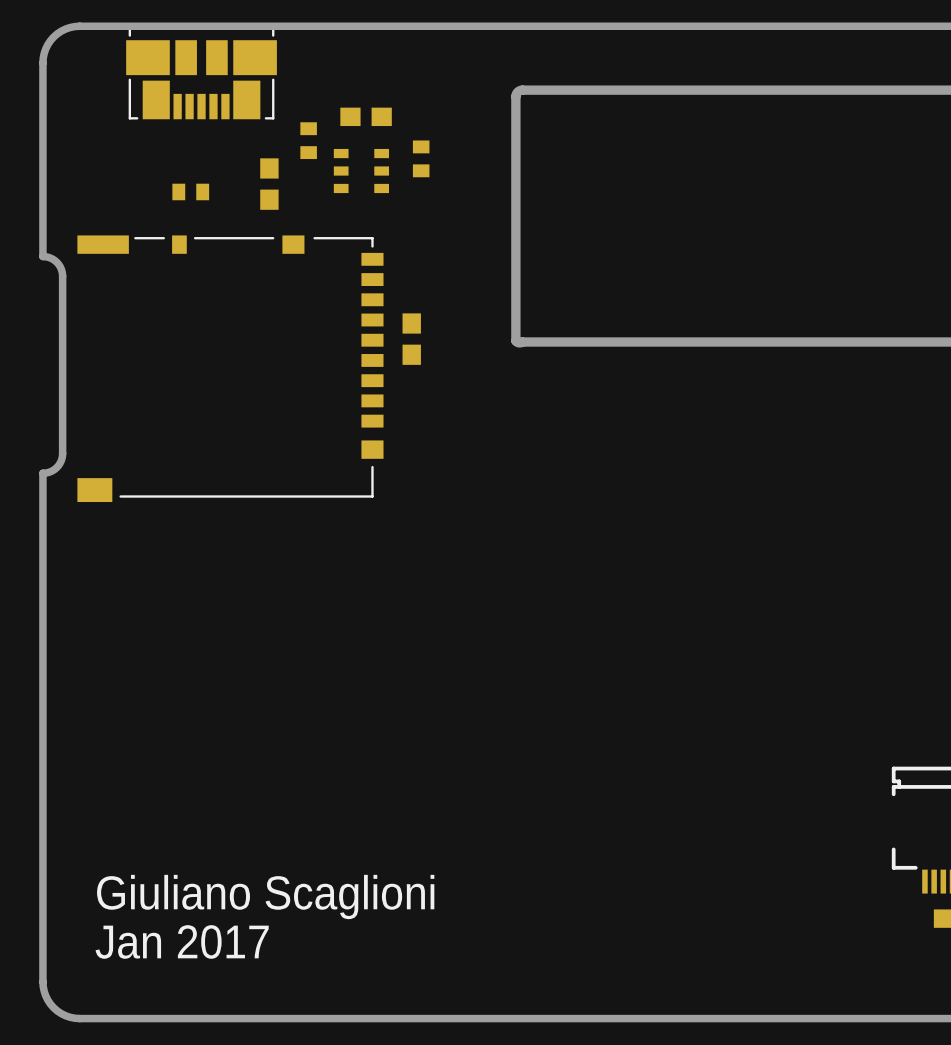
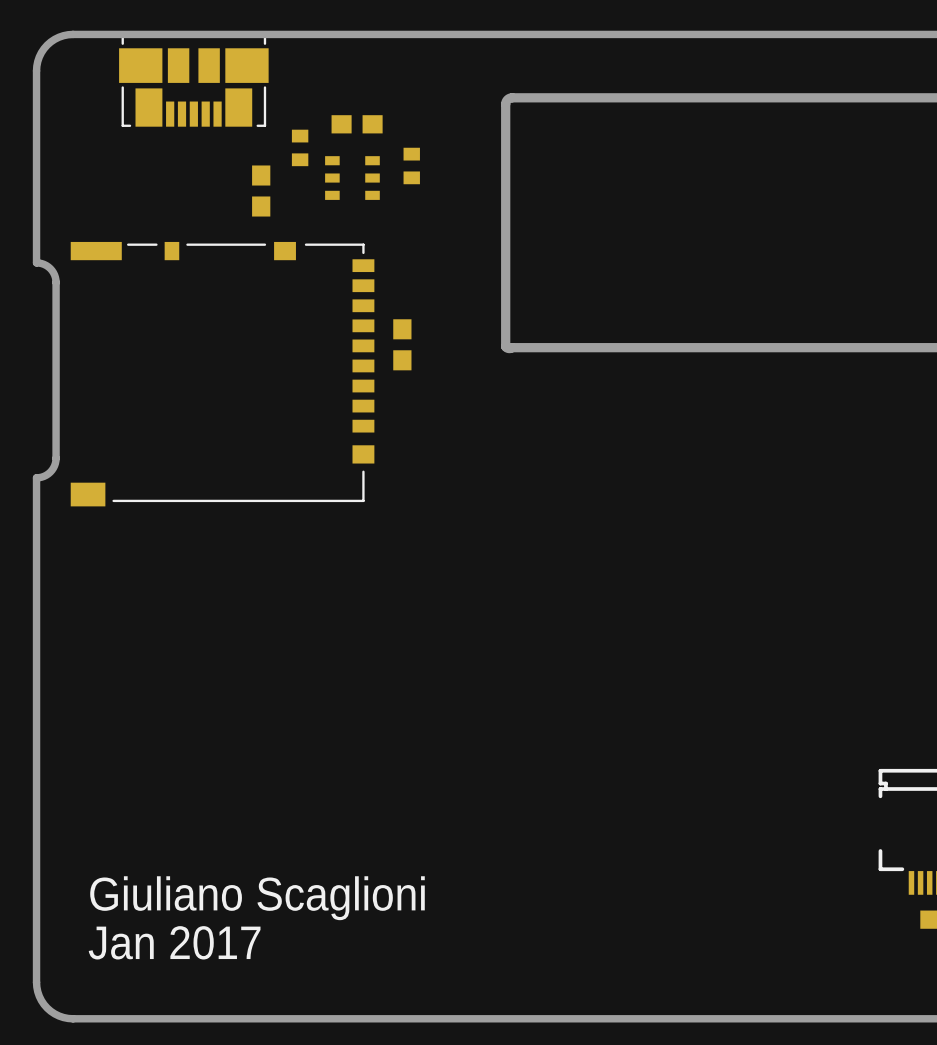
part: (190, 191) -> none

